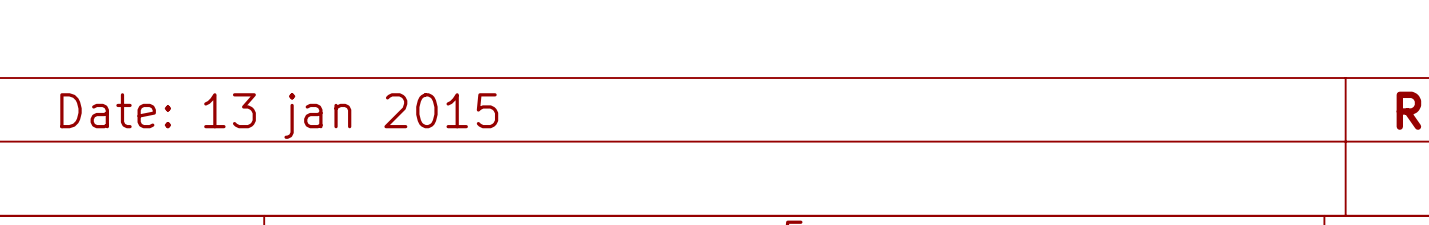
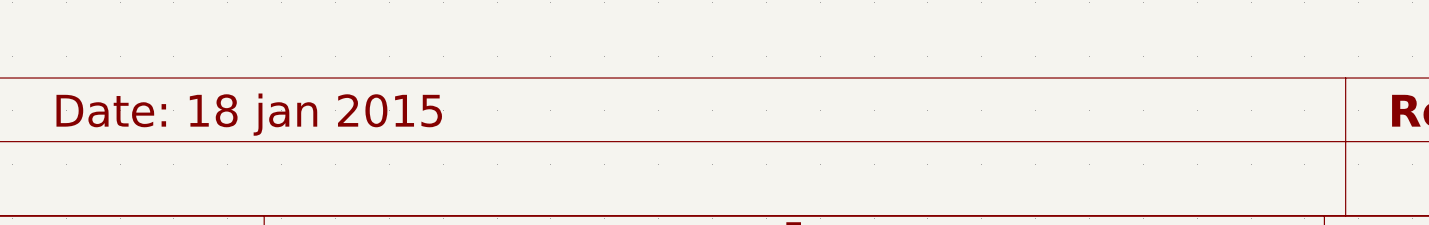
title block: Date: 13 jan 2015 (279, 116) -> Date: 18 jan 2015 (249, 114)

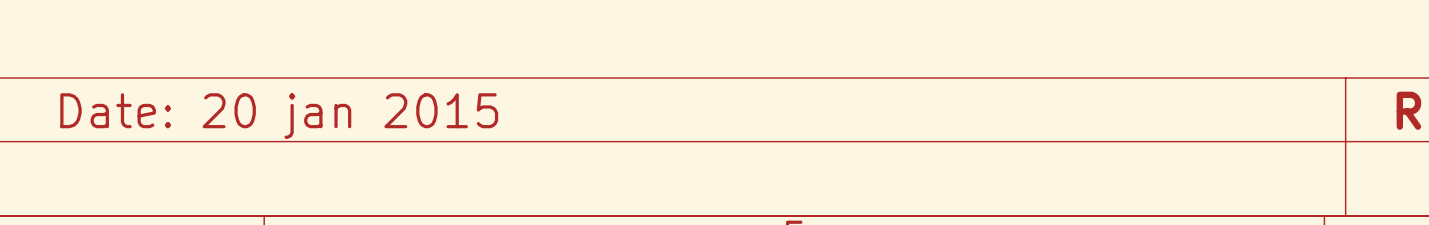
title block: Date: 18 jan 2015 (249, 114) -> Date: 20 jan 2015 (279, 116)

